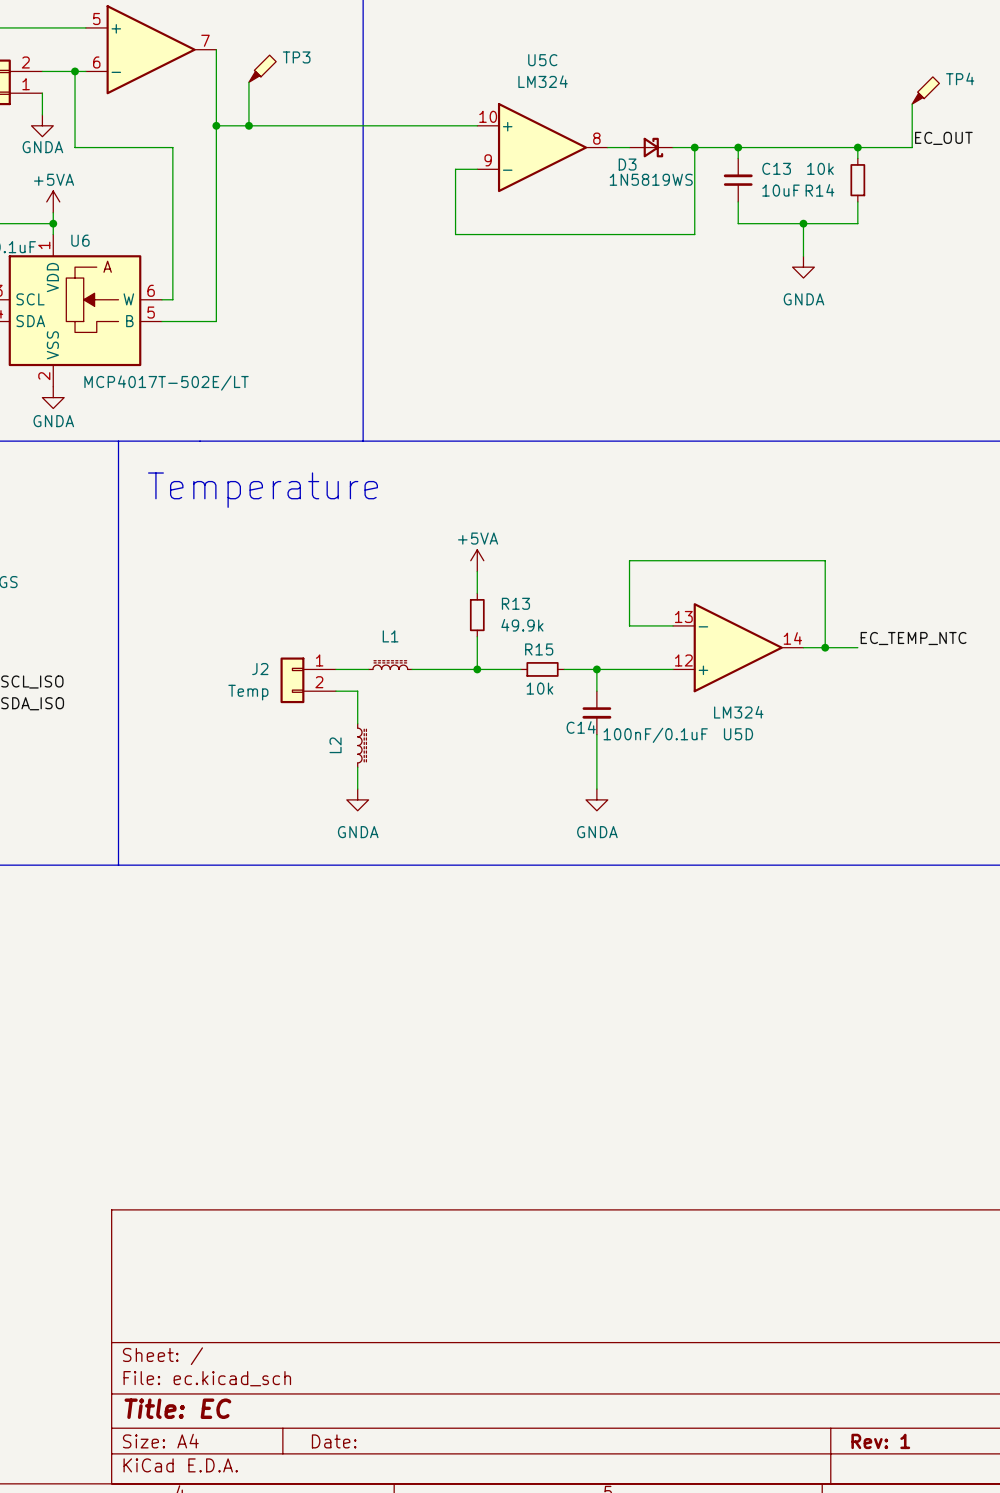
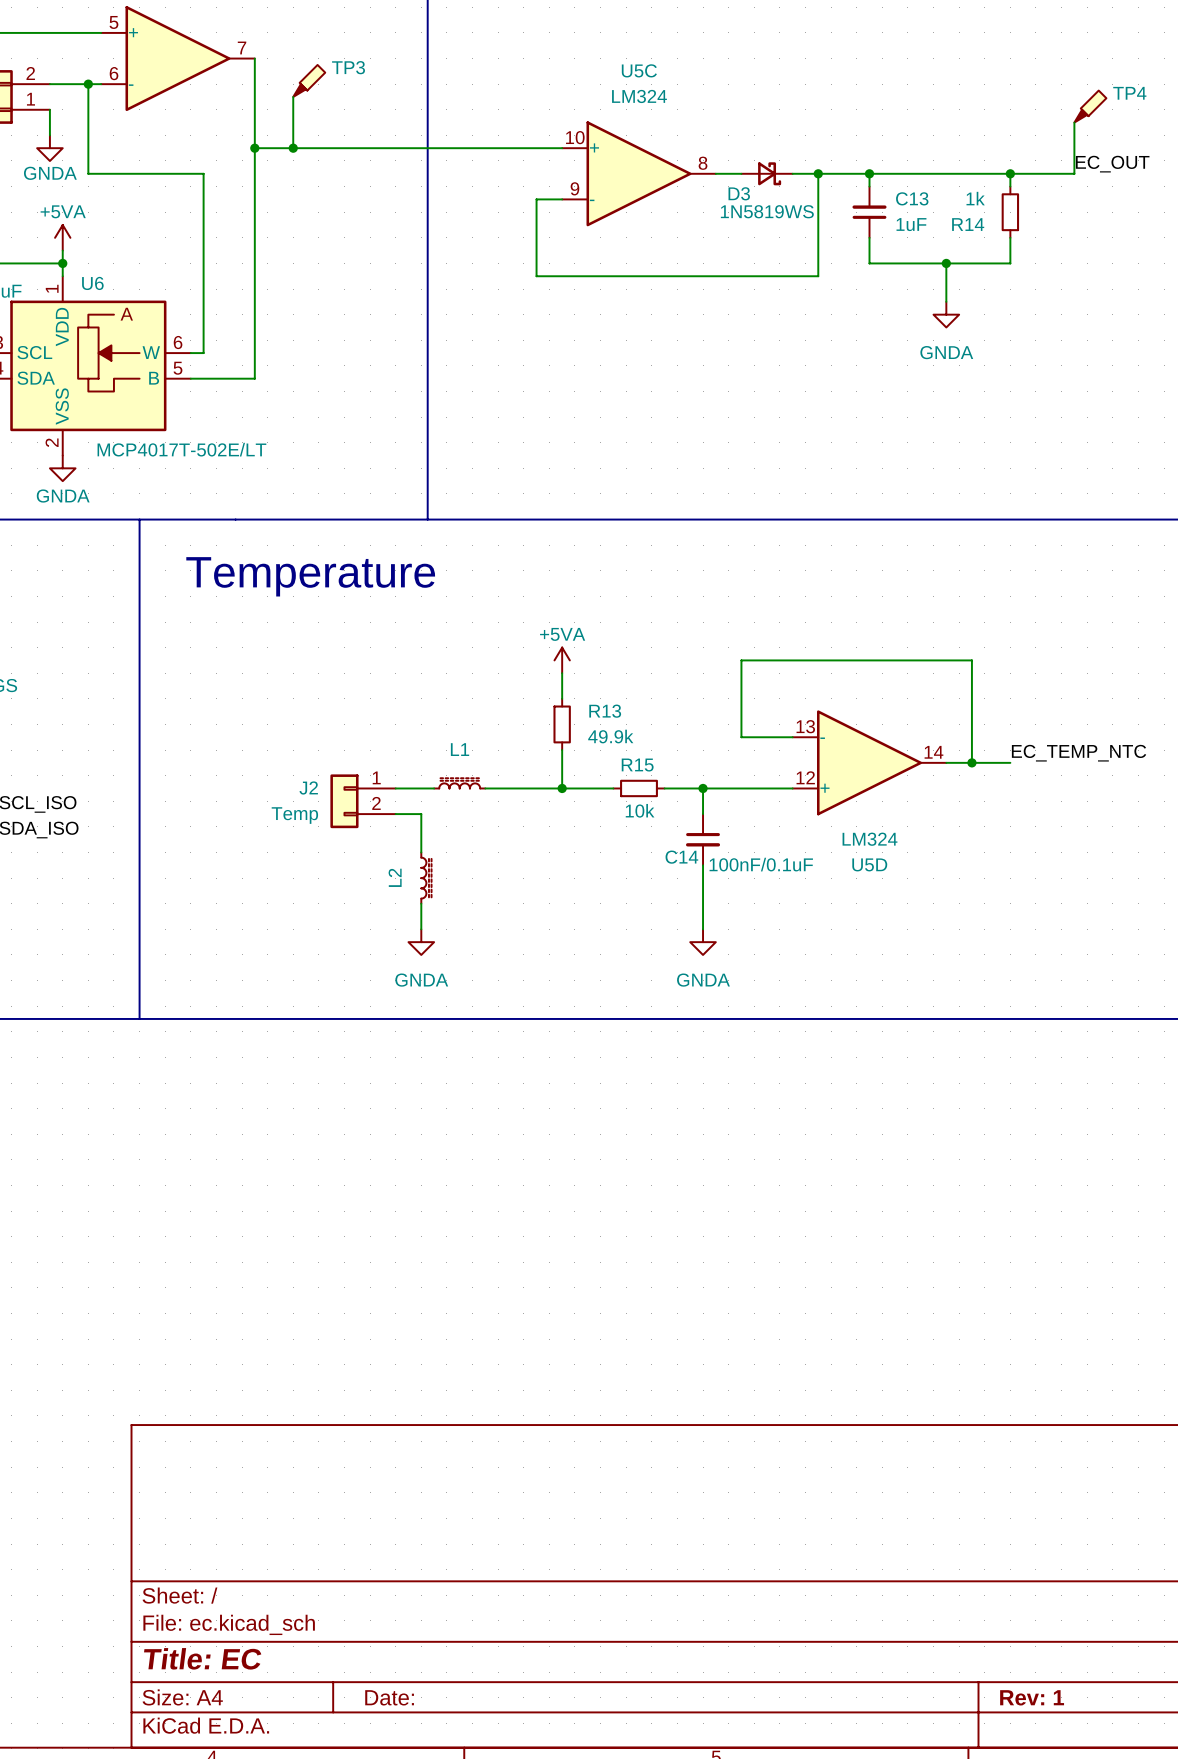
R14 value: 10k (820, 168) -> 1k (975, 198)
C13 value: 10uF (781, 190) -> 1uF (911, 224)

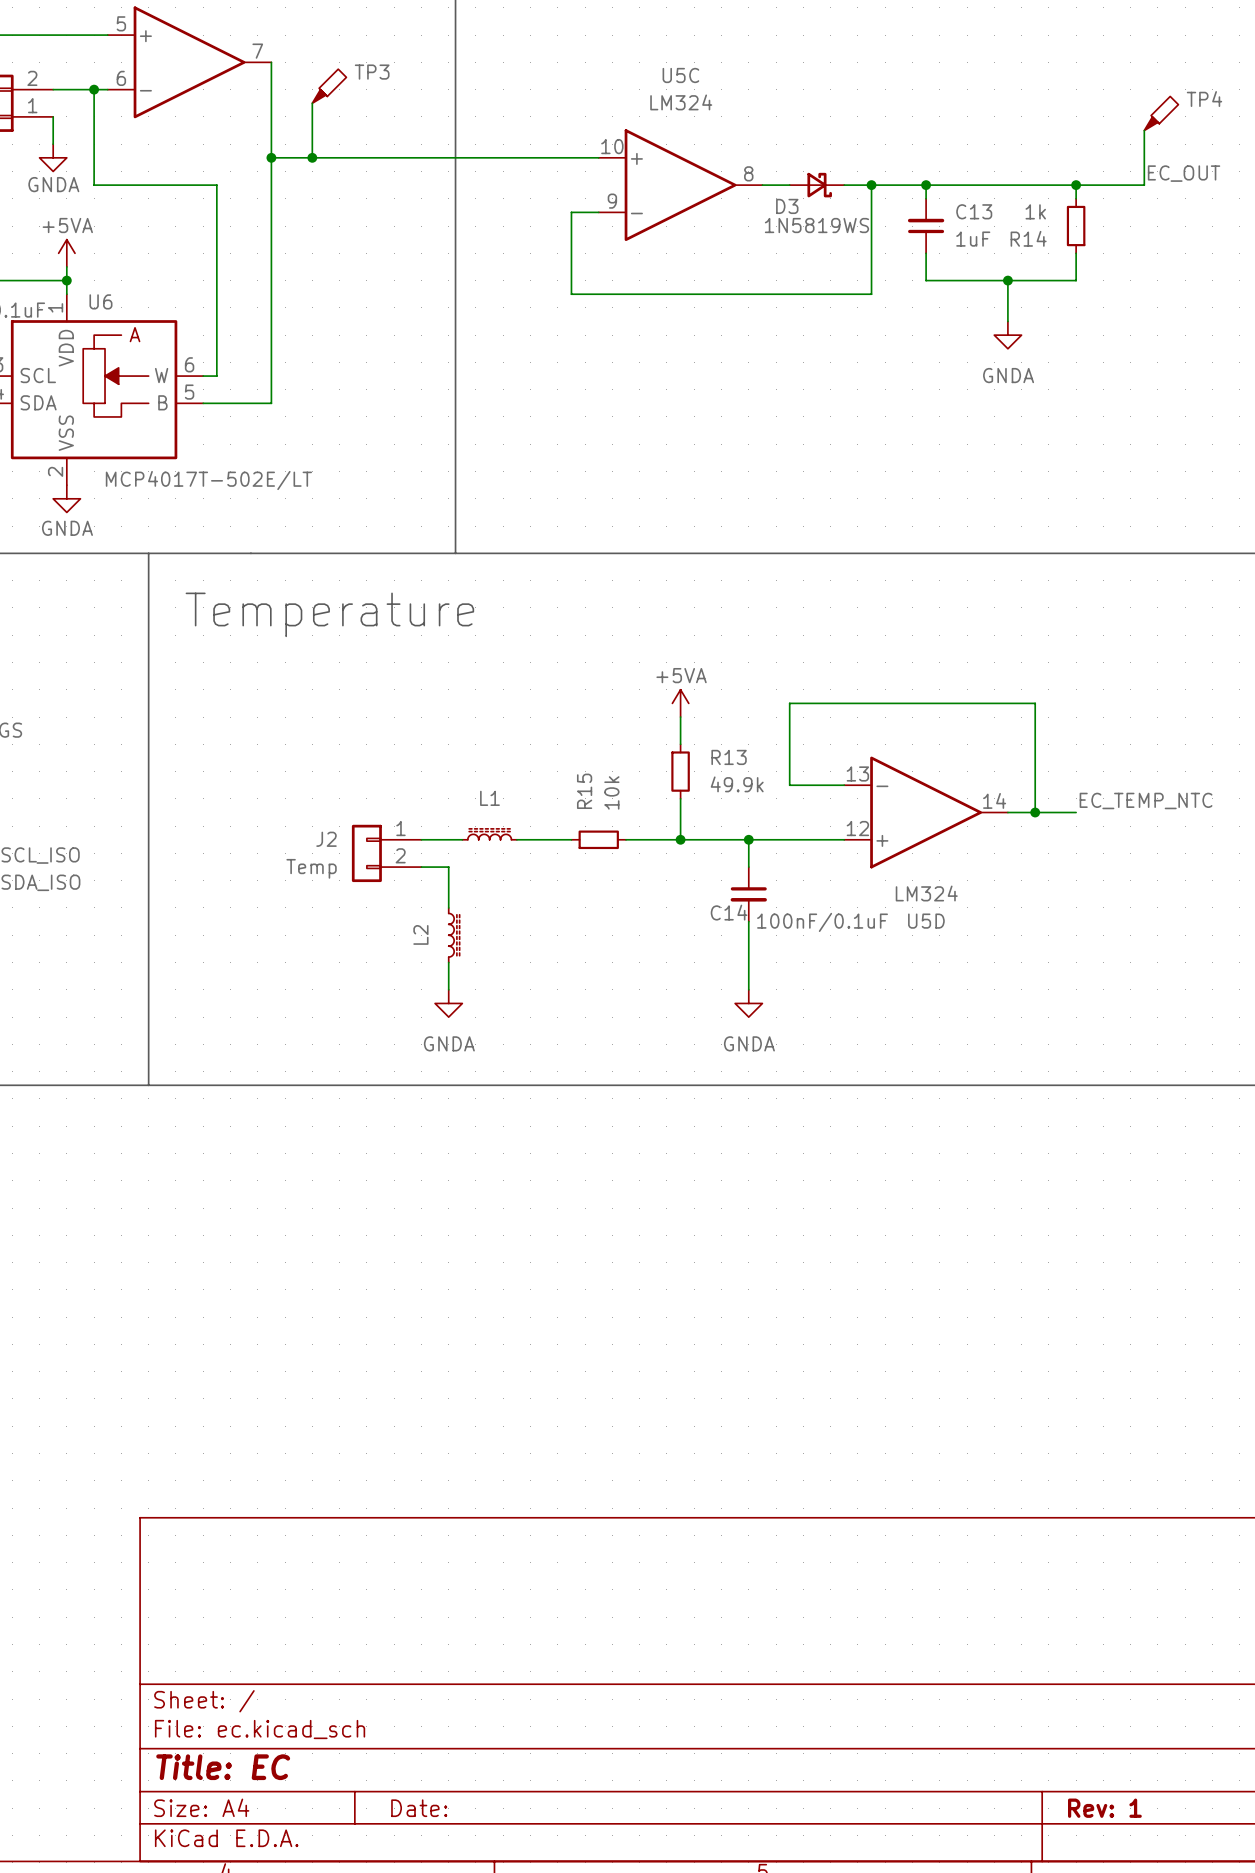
power symbol position: +5VA (562, 660) -> +5VA (680, 703)
wire: (562, 673) (562, 698) -> (680, 717) (680, 744)
R13 position: (562, 724) -> (680, 771)
wire: (562, 750) (562, 788) -> (680, 798) (680, 839)
R15 name rotation: 0° (637, 765) -> 90° counterclockwise (584, 791)
wire: (536, 788) (587, 788) -> (653, 839) (707, 839)
junction: (562, 788) -> none
junction: none -> (680, 839)
R15 position: (639, 788) -> (598, 839)
R15 value rotation: 0° (640, 810) -> 90° counterclockwise (611, 792)
R15 value position: 10k (640, 810) -> 10k (611, 792)

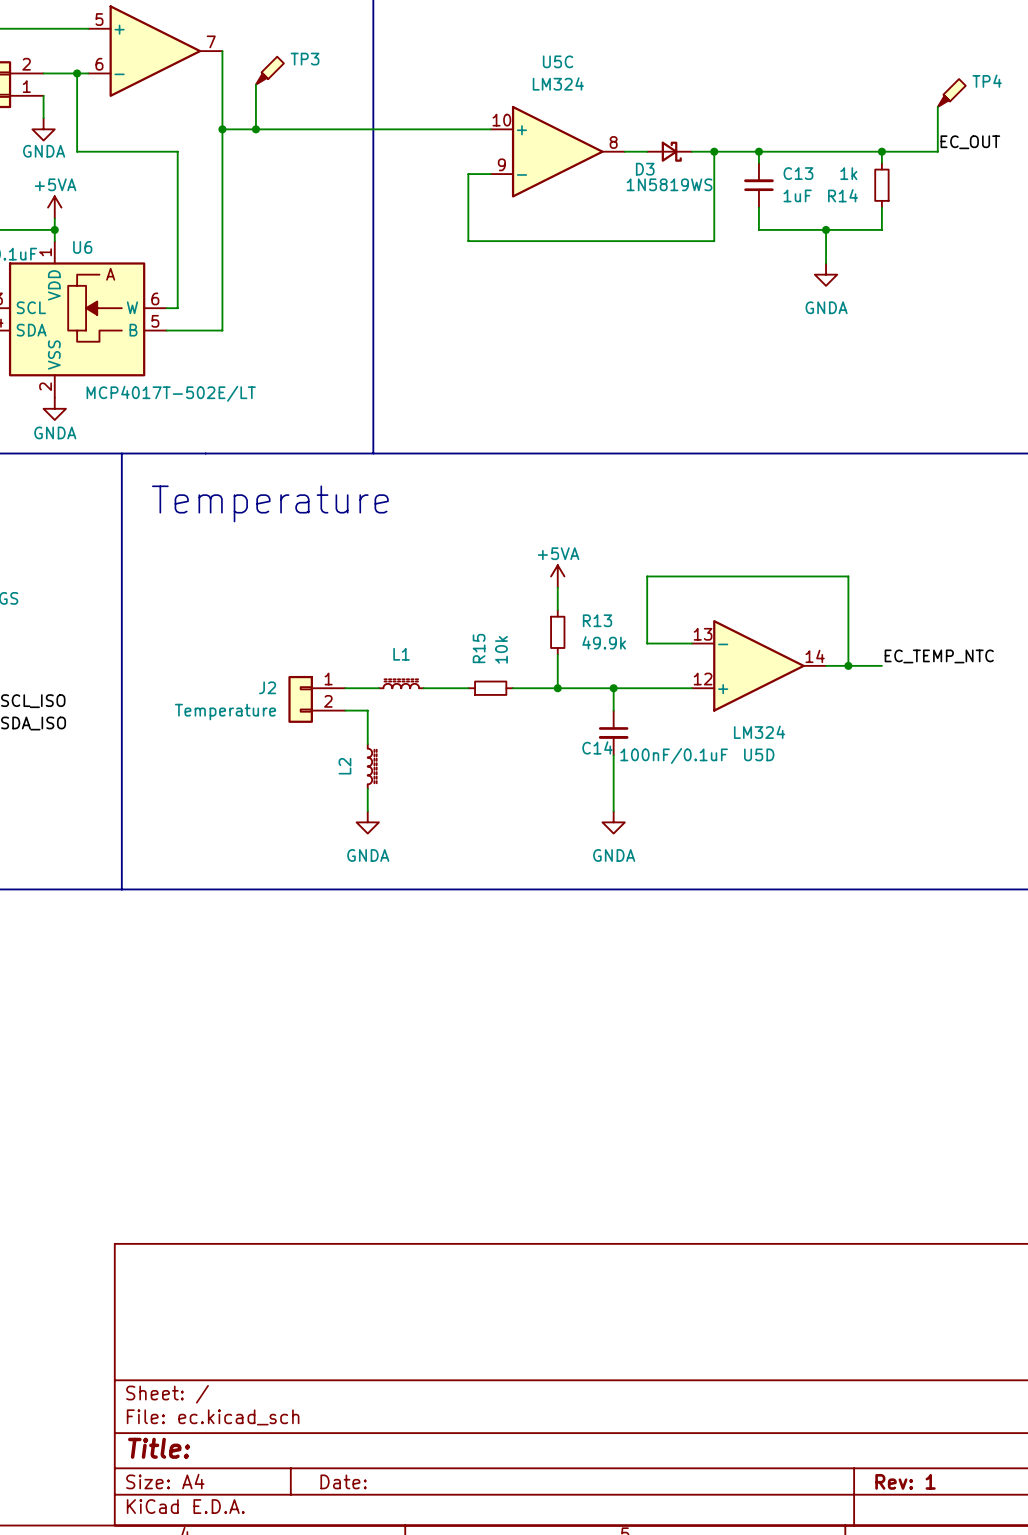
J2 value: Temp (311, 868) -> Temperature (225, 712)
title block: Title: EC (223, 1767) -> Title: (159, 1448)

